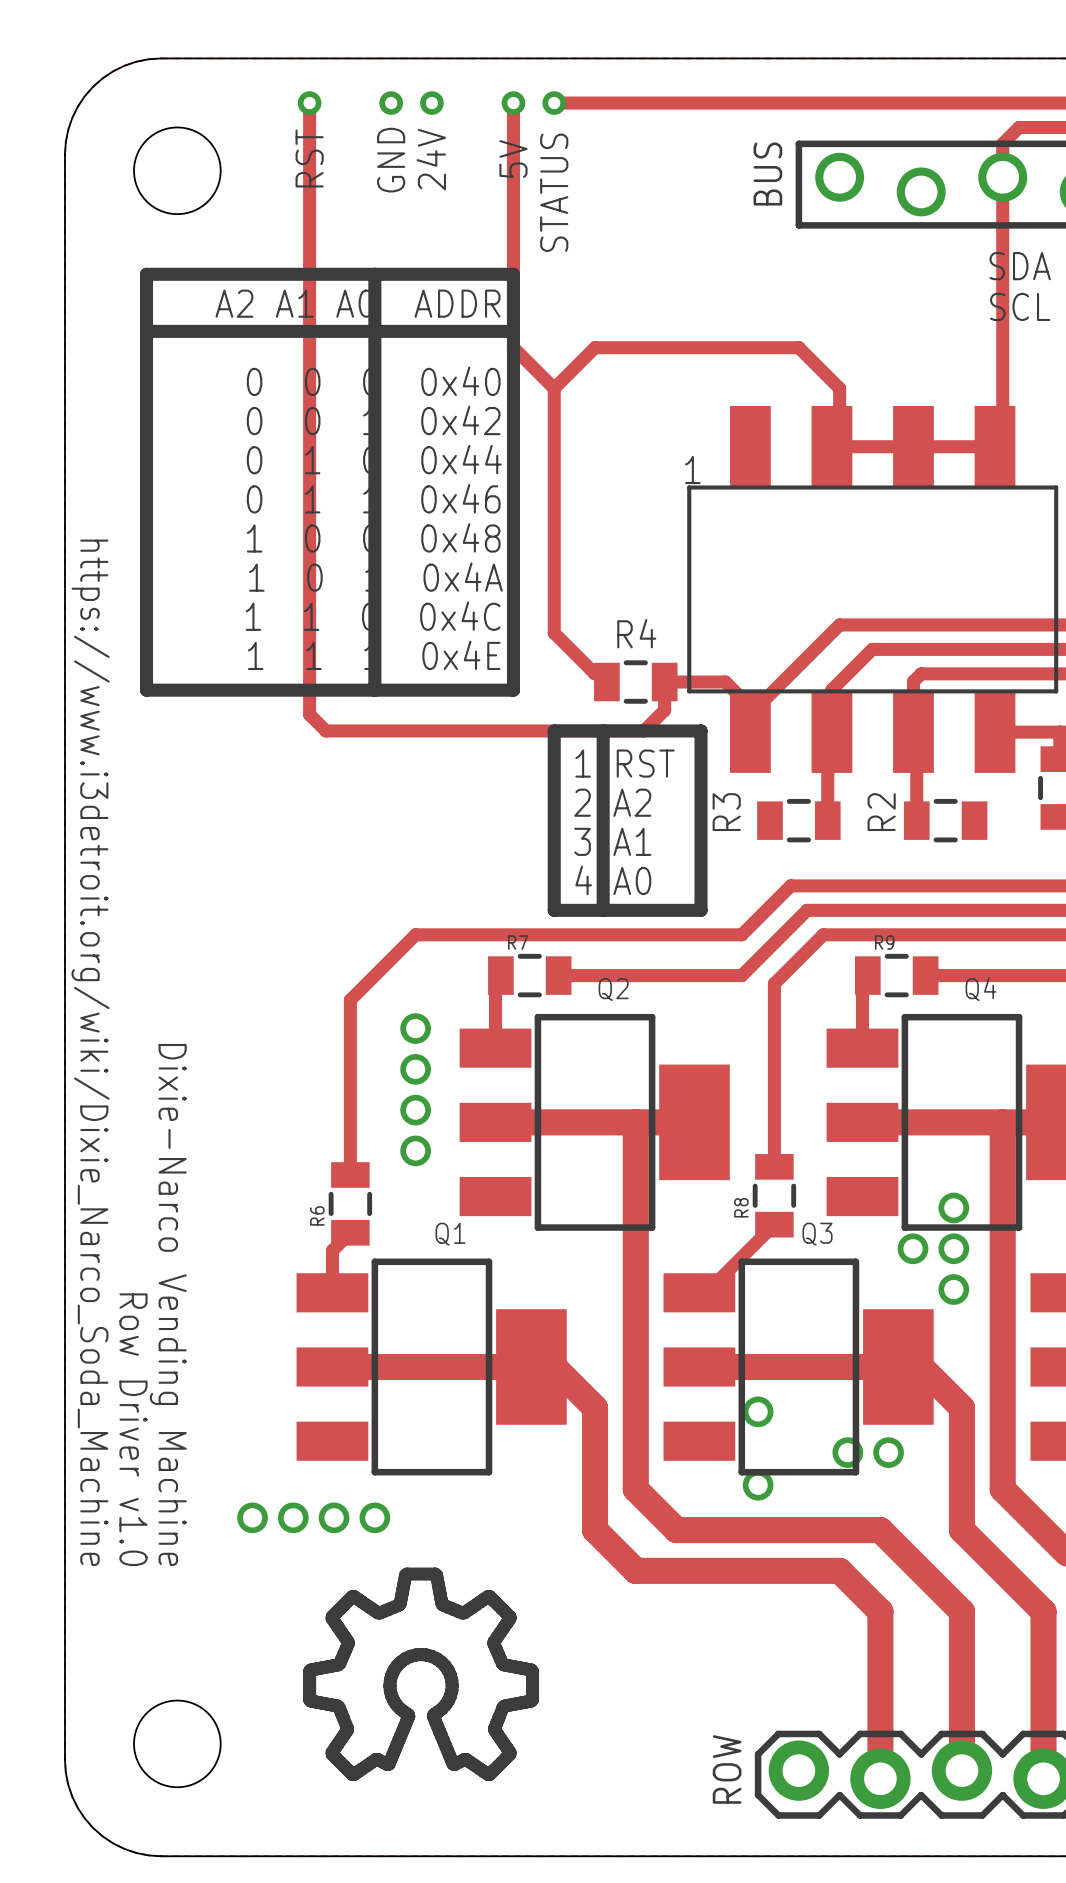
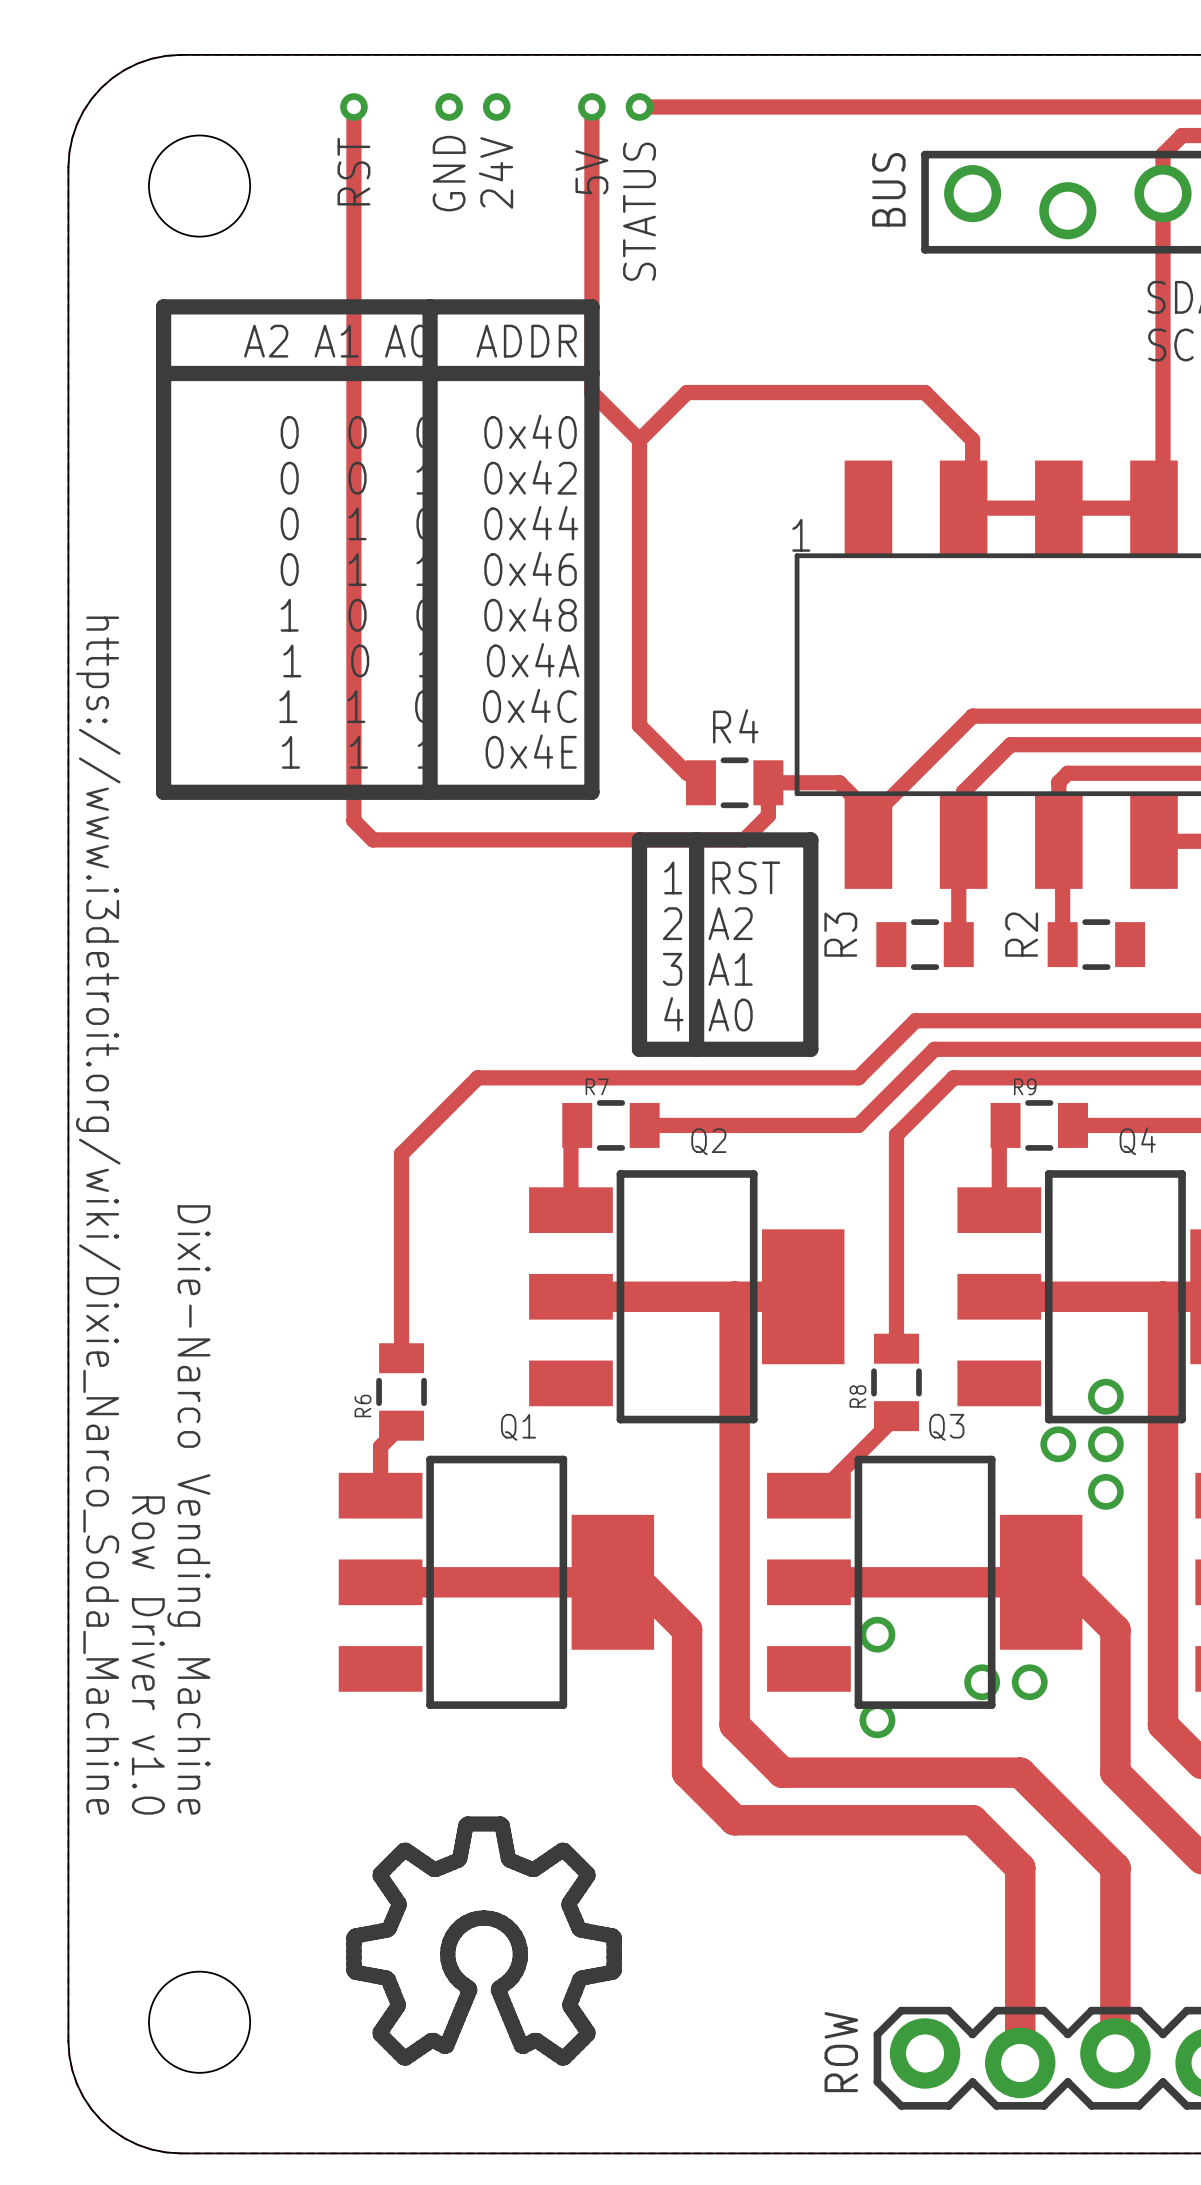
via: (415, 1028) -> none
via: (415, 1069) -> none
via: (415, 1110) -> none
via: (415, 1150) -> none
via: (252, 1517) -> none
via: (293, 1517) -> none
via: (334, 1517) -> none
via: (374, 1517) -> none

